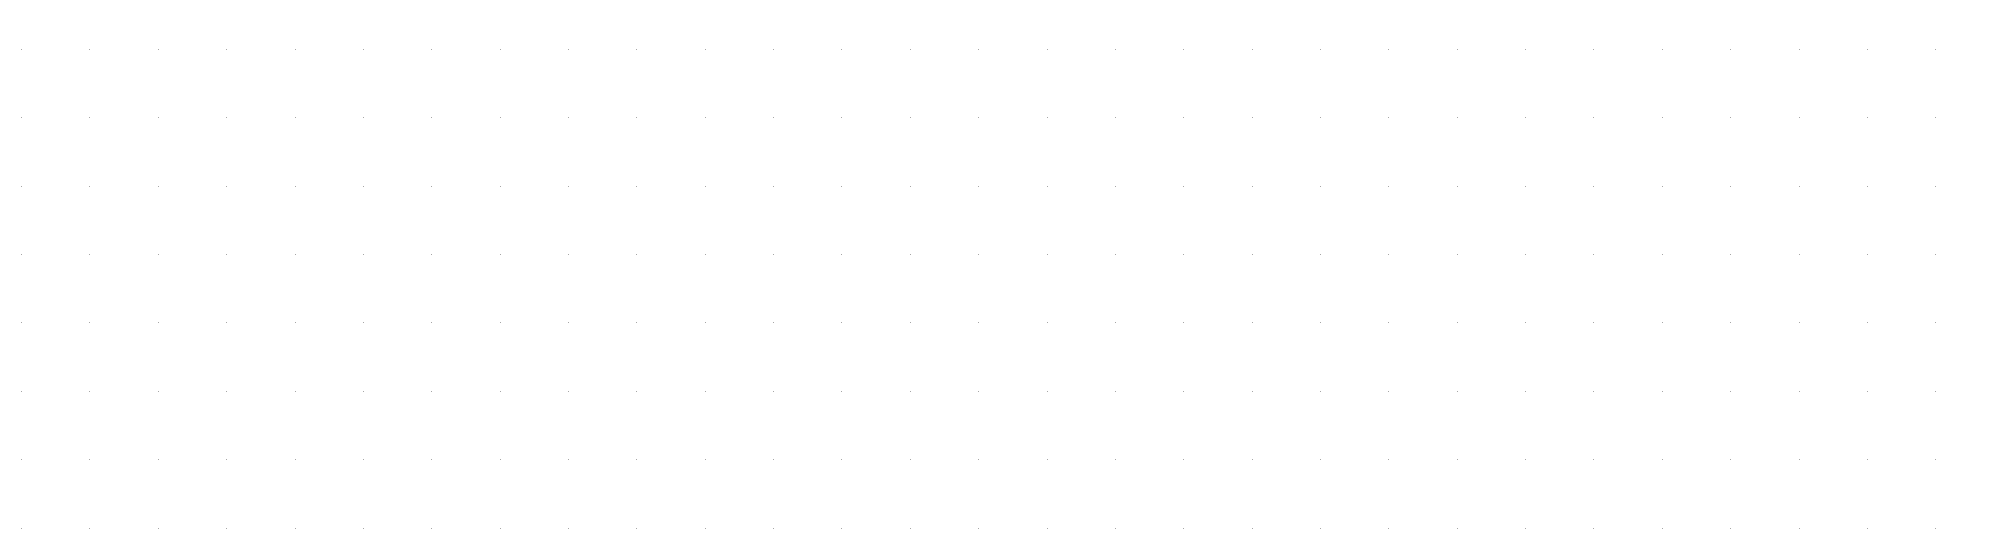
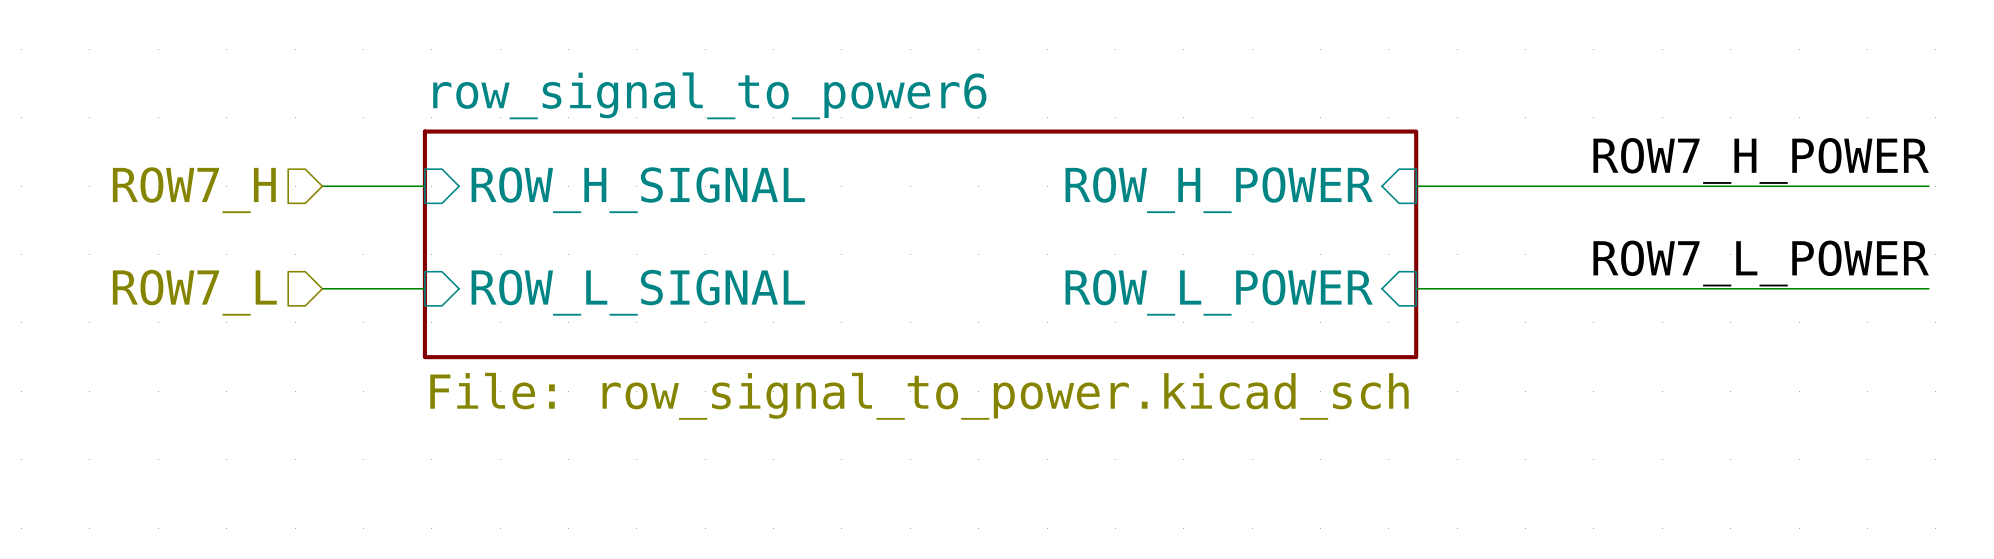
label: none -> ROW7_H_POWER (1761, 160)
wire: none -> (322, 186) (424, 186)
wire: none -> (1416, 186) (1928, 186)
hierarchical label: none -> ROW7_H (194, 190)
sheet pin: none -> ROW_H_SIGNAL (638, 190)
sheet pin: none -> ROW_H_POWER (1219, 190)
sheet row_signal_to_power6: none -> File: row_signal_to_power.kicad_sch (920, 244)
label: none -> ROW7_L_POWER (1761, 263)
wire: none -> (322, 288) (424, 288)
wire: none -> (1416, 288) (1928, 288)
hierarchical label: none -> ROW7_L (194, 292)
sheet pin: none -> ROW_L_SIGNAL (638, 292)
sheet pin: none -> ROW_L_POWER (1219, 292)

